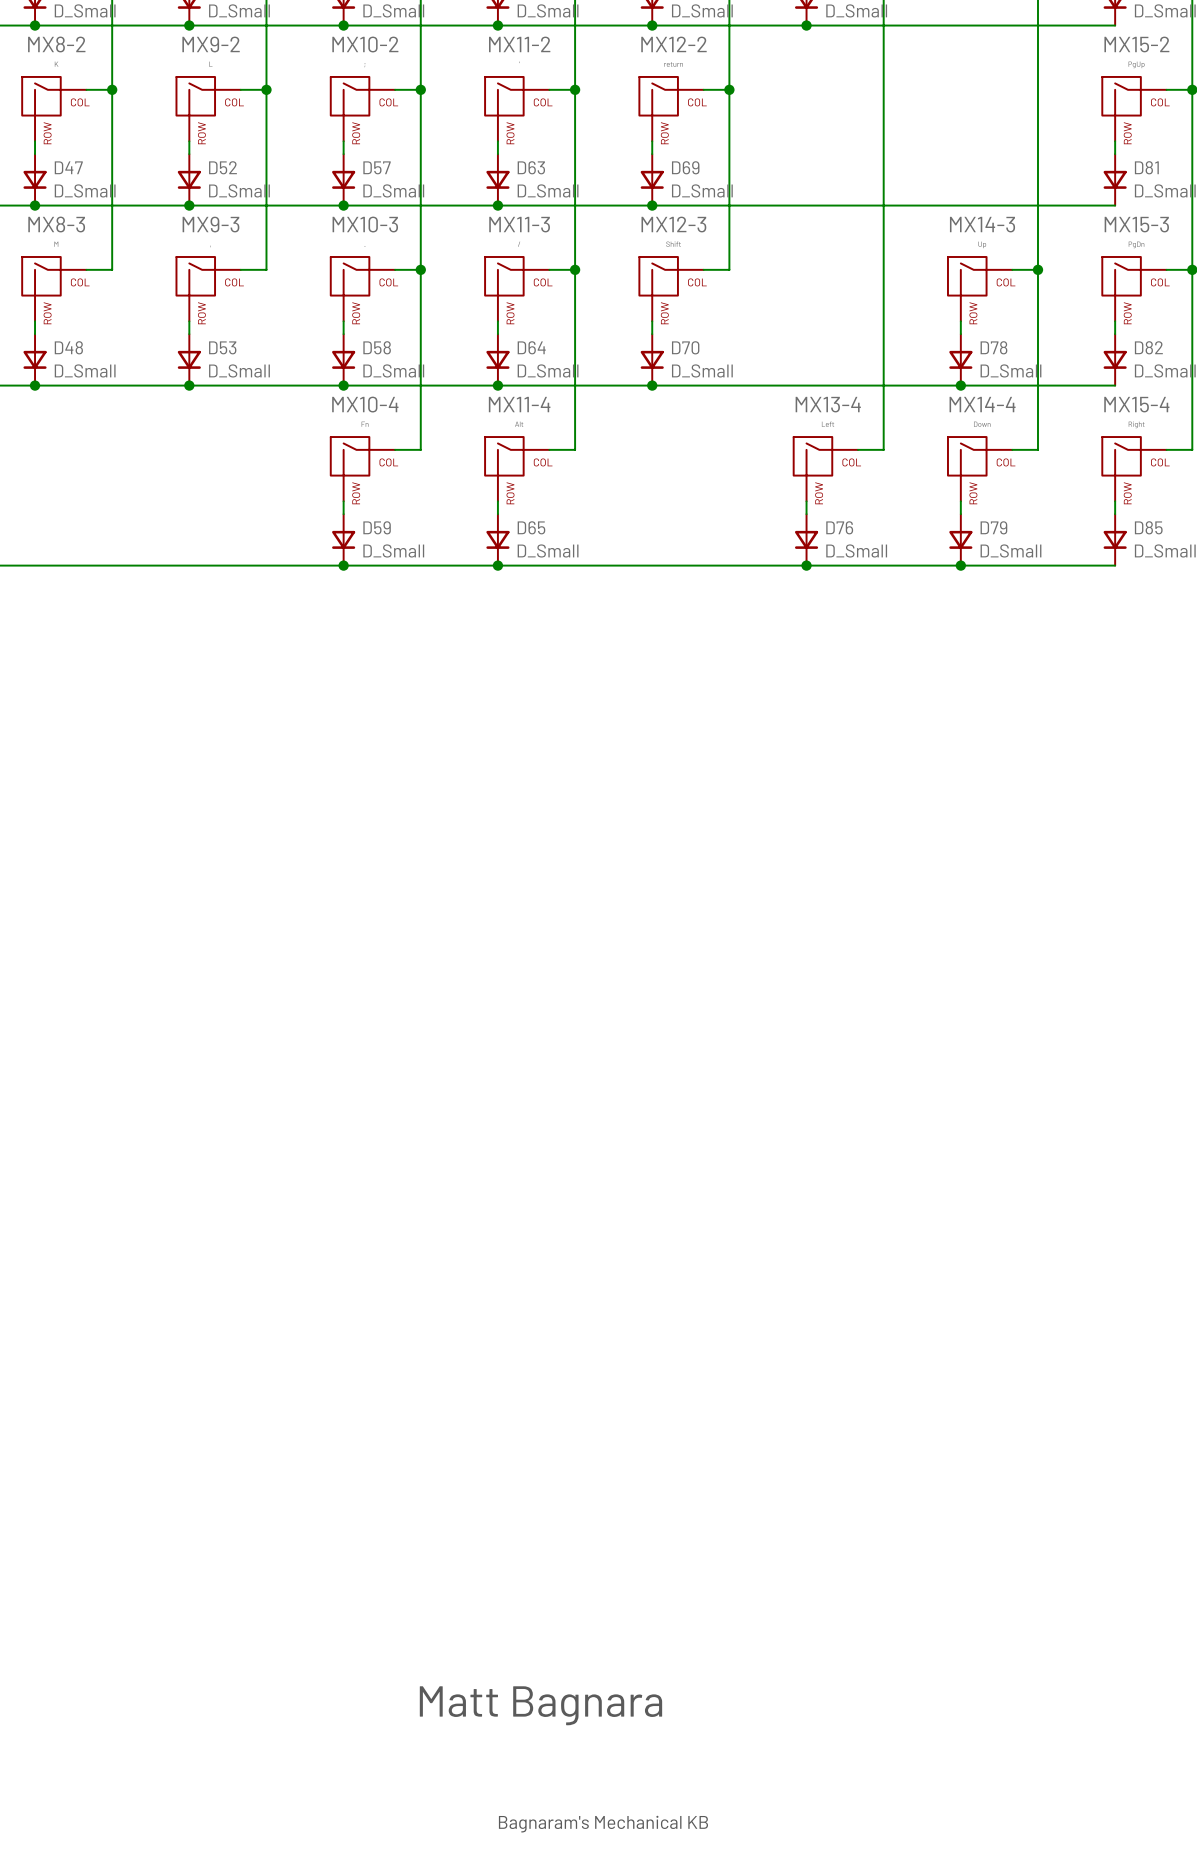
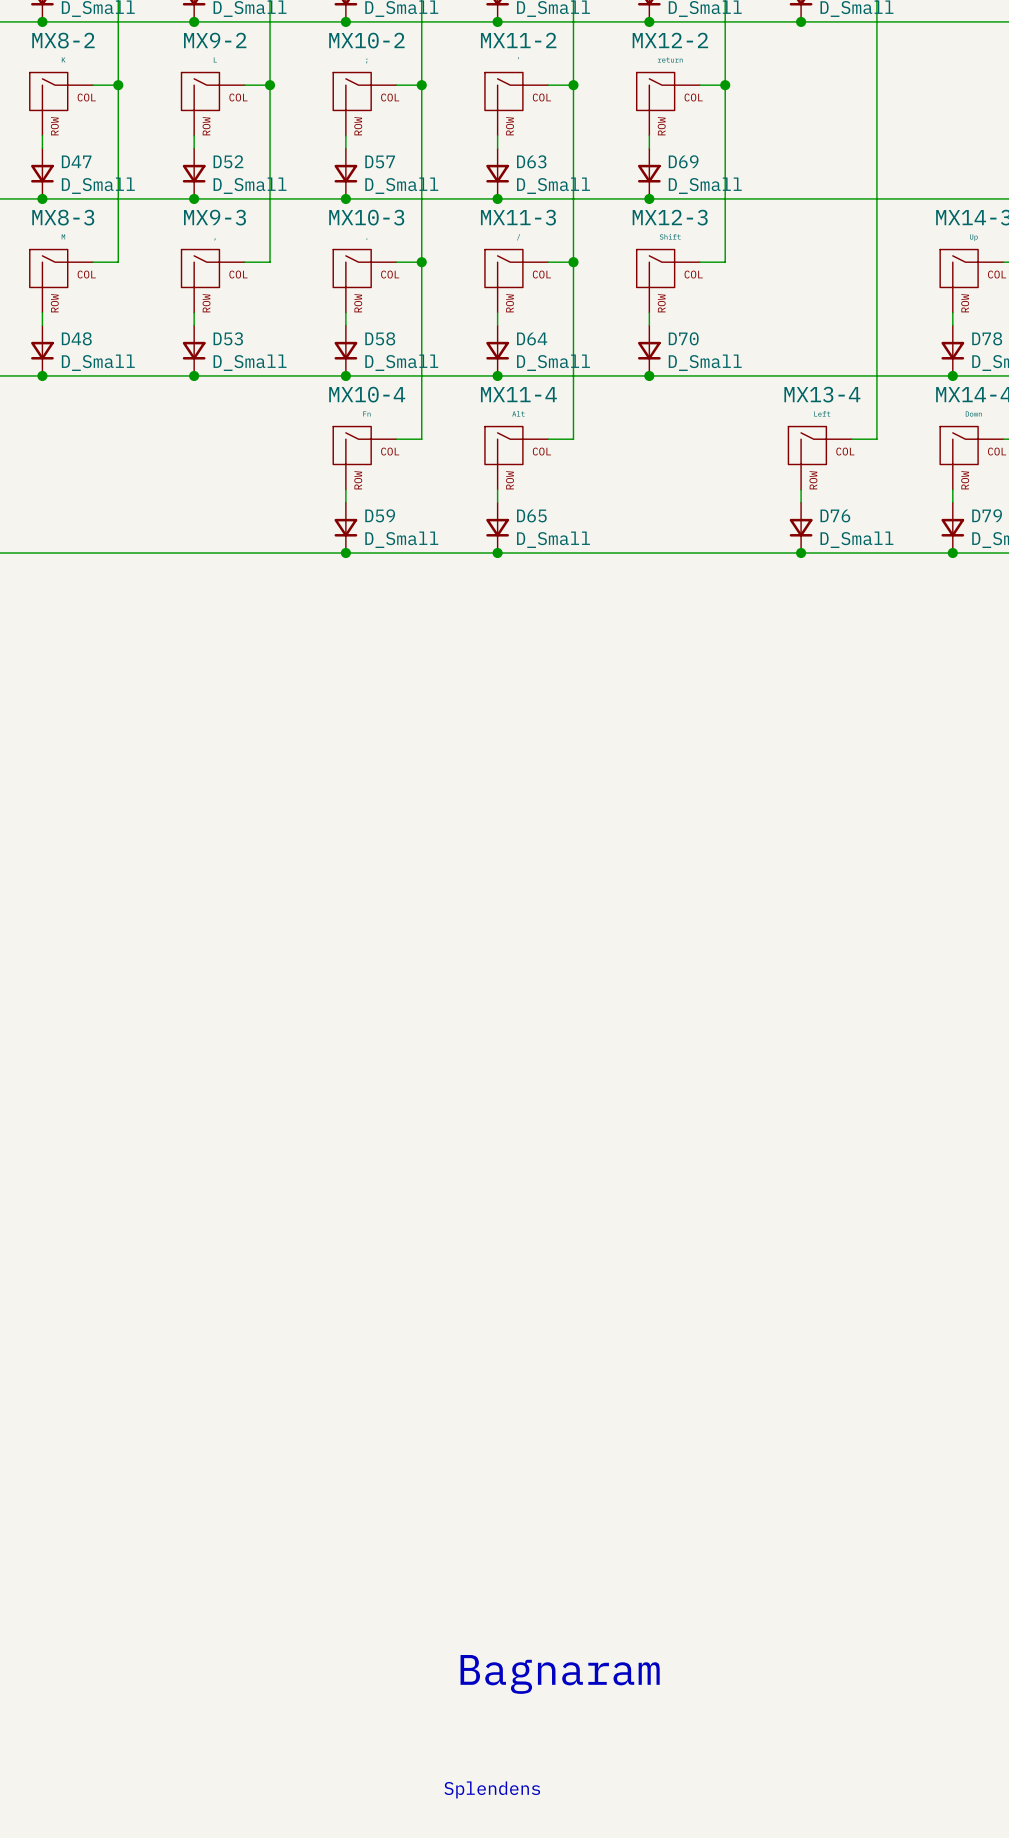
text: Matt Bagnara (540, 1705) -> Bagnaram (560, 1674)
text: none -> Splendens (492, 1789)
text: Bagnaram's Mechanical KB (603, 1824) -> none

